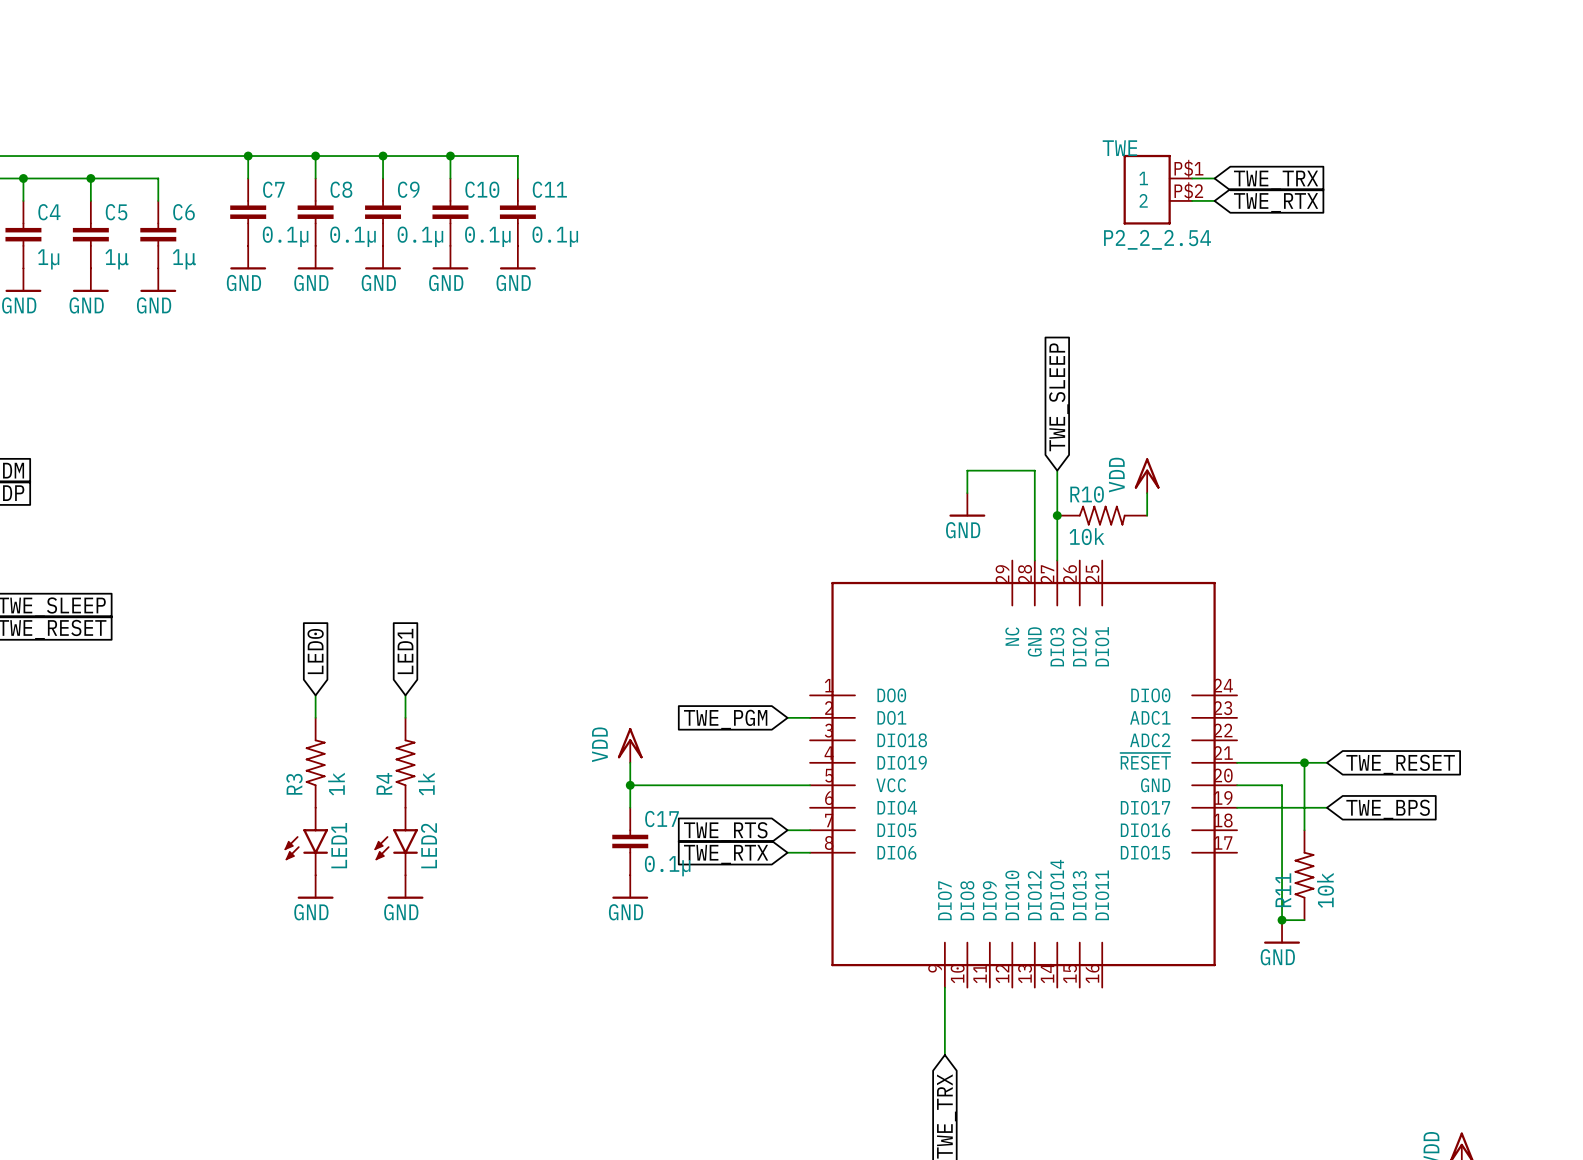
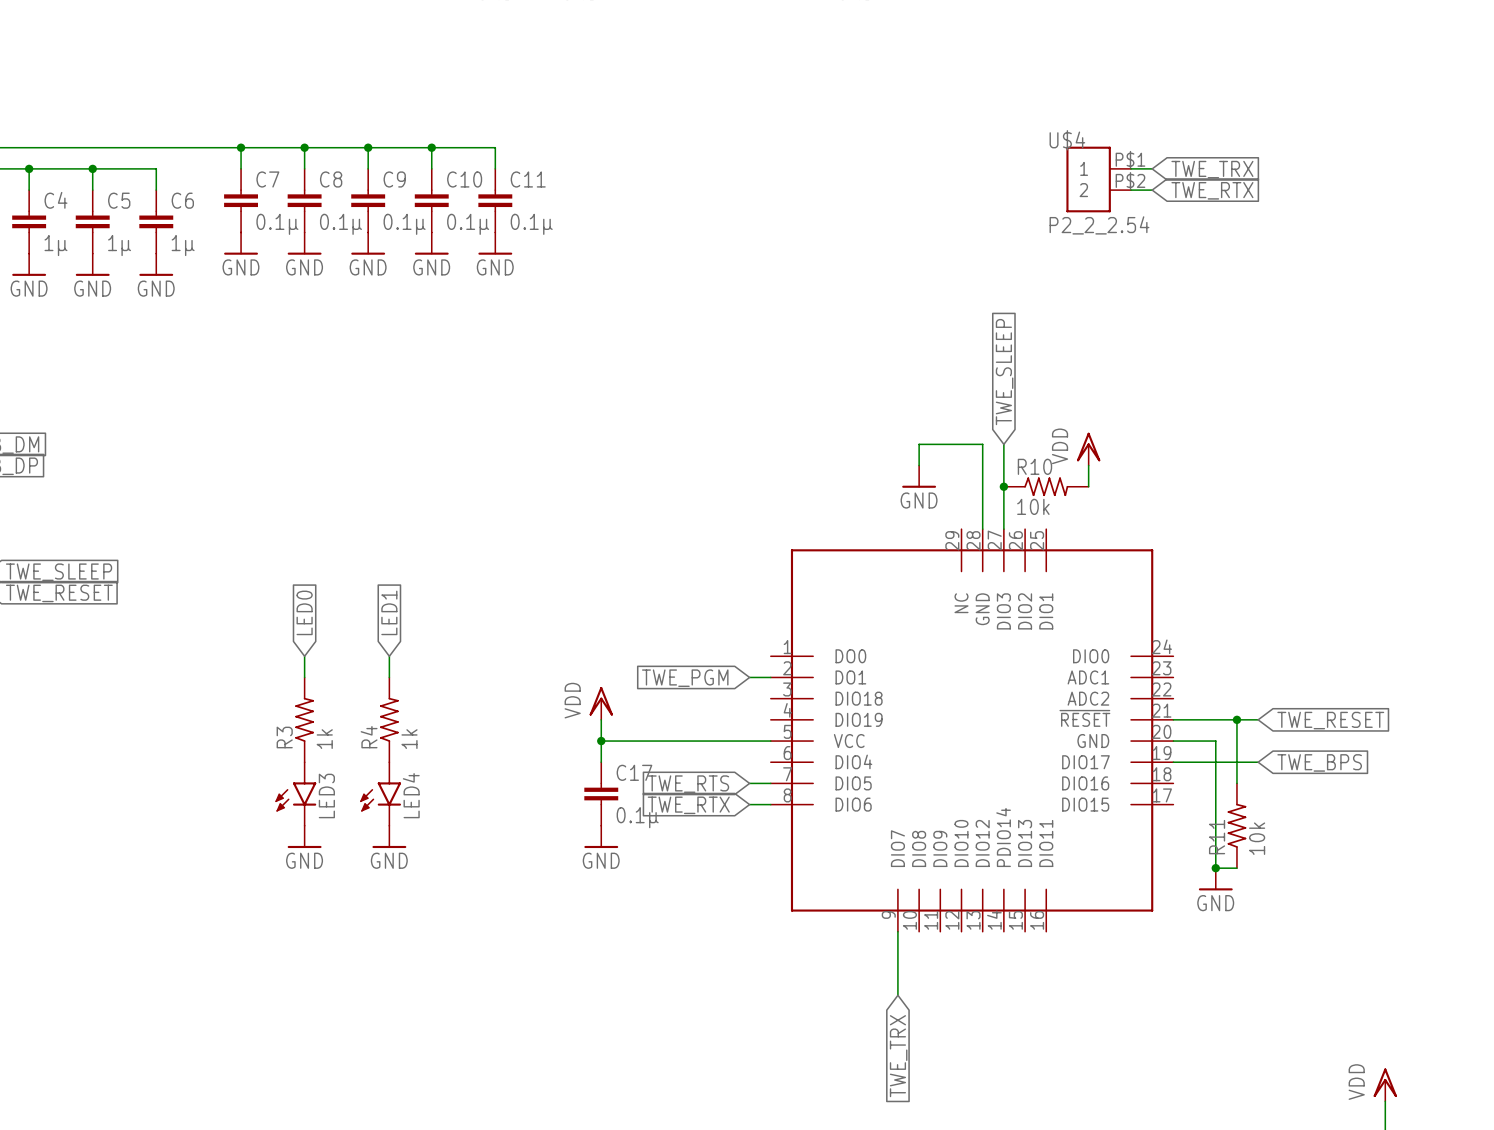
TWE name: TWE (1119, 148) -> U$4 (1067, 140)
LED1 name: LED1 (339, 845) -> LED3 (326, 795)
LED2 name: LED2 (428, 845) -> LED4 (411, 795)

